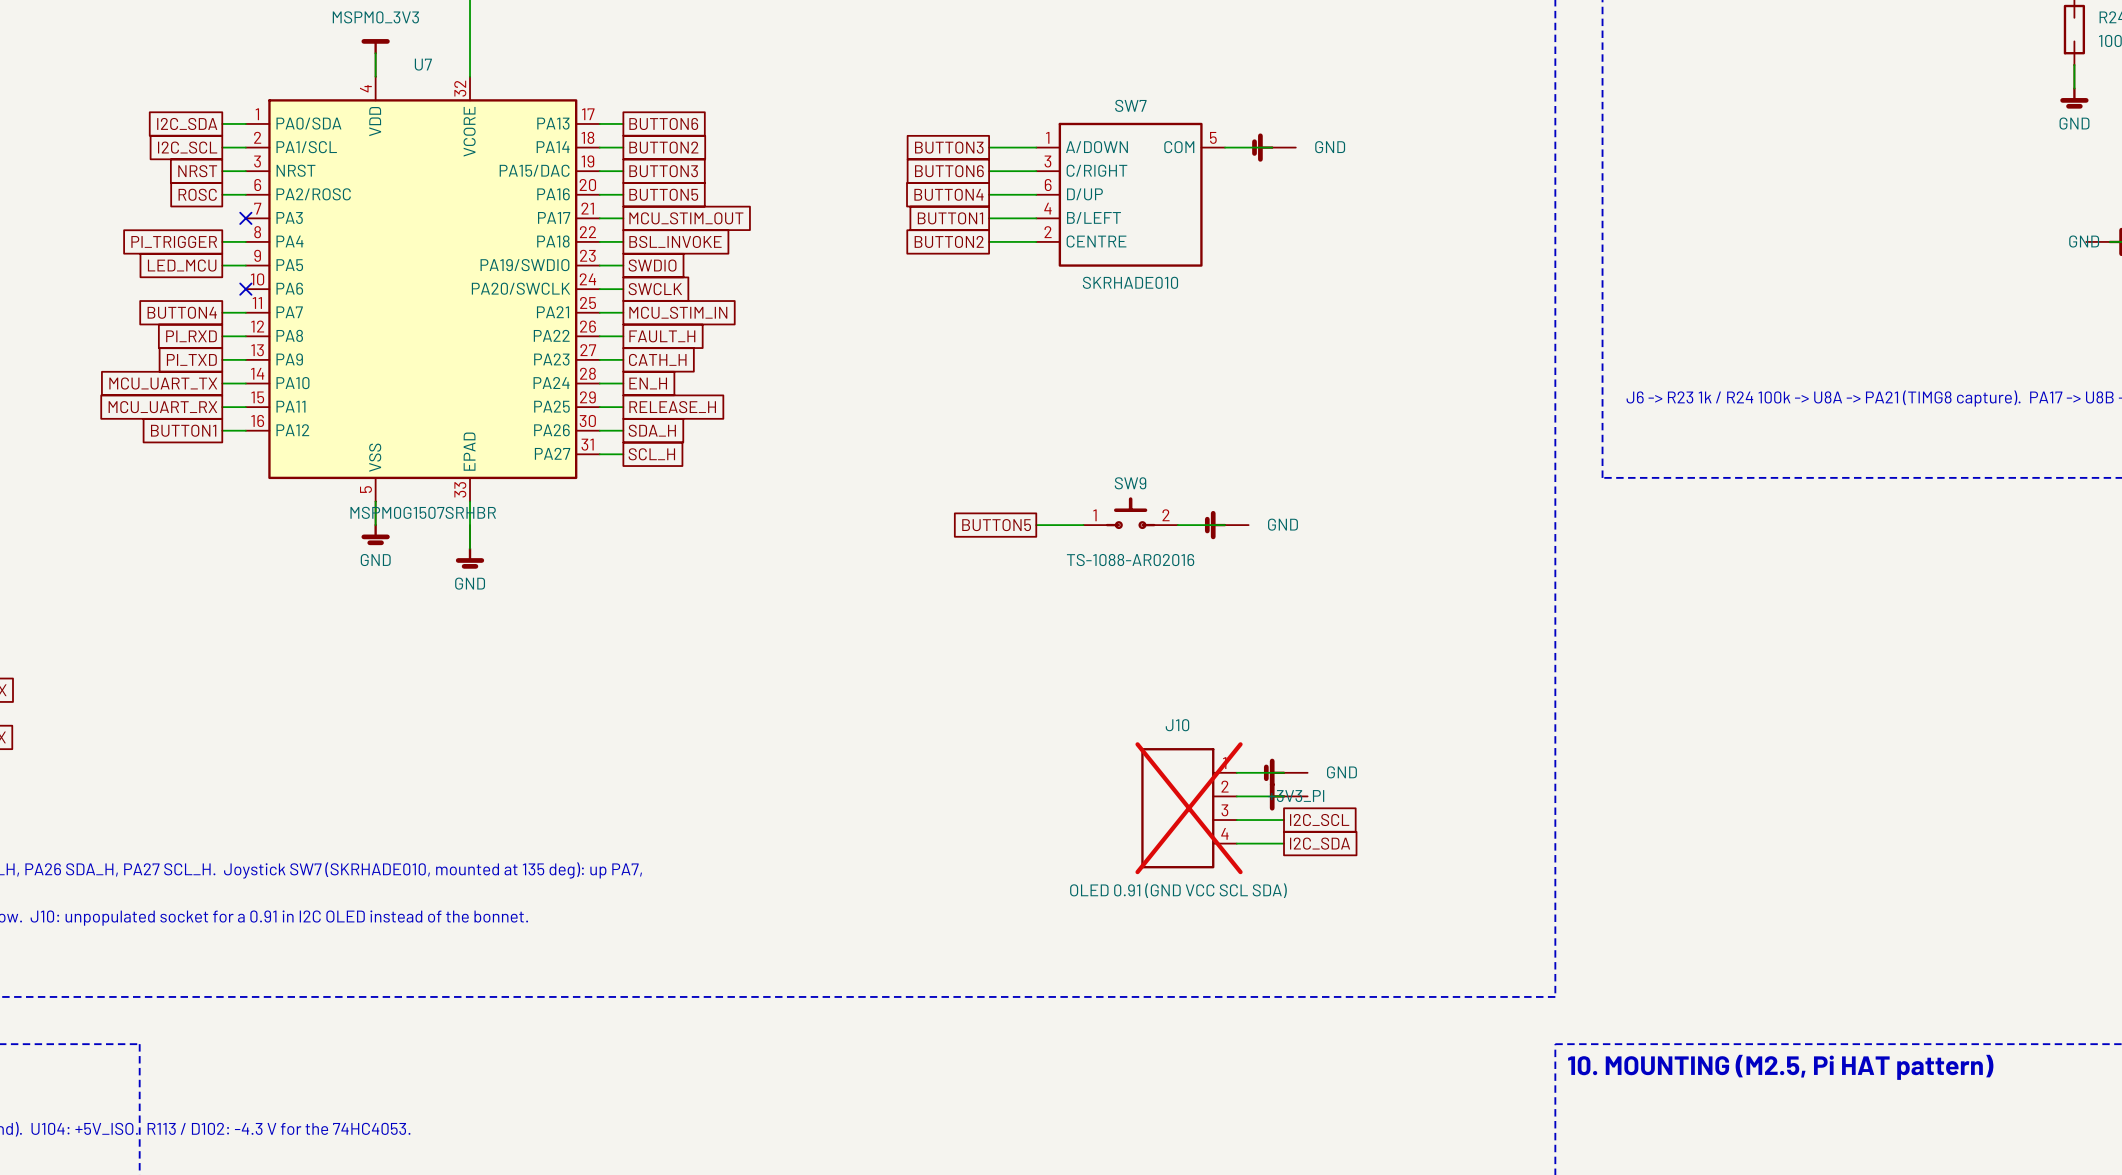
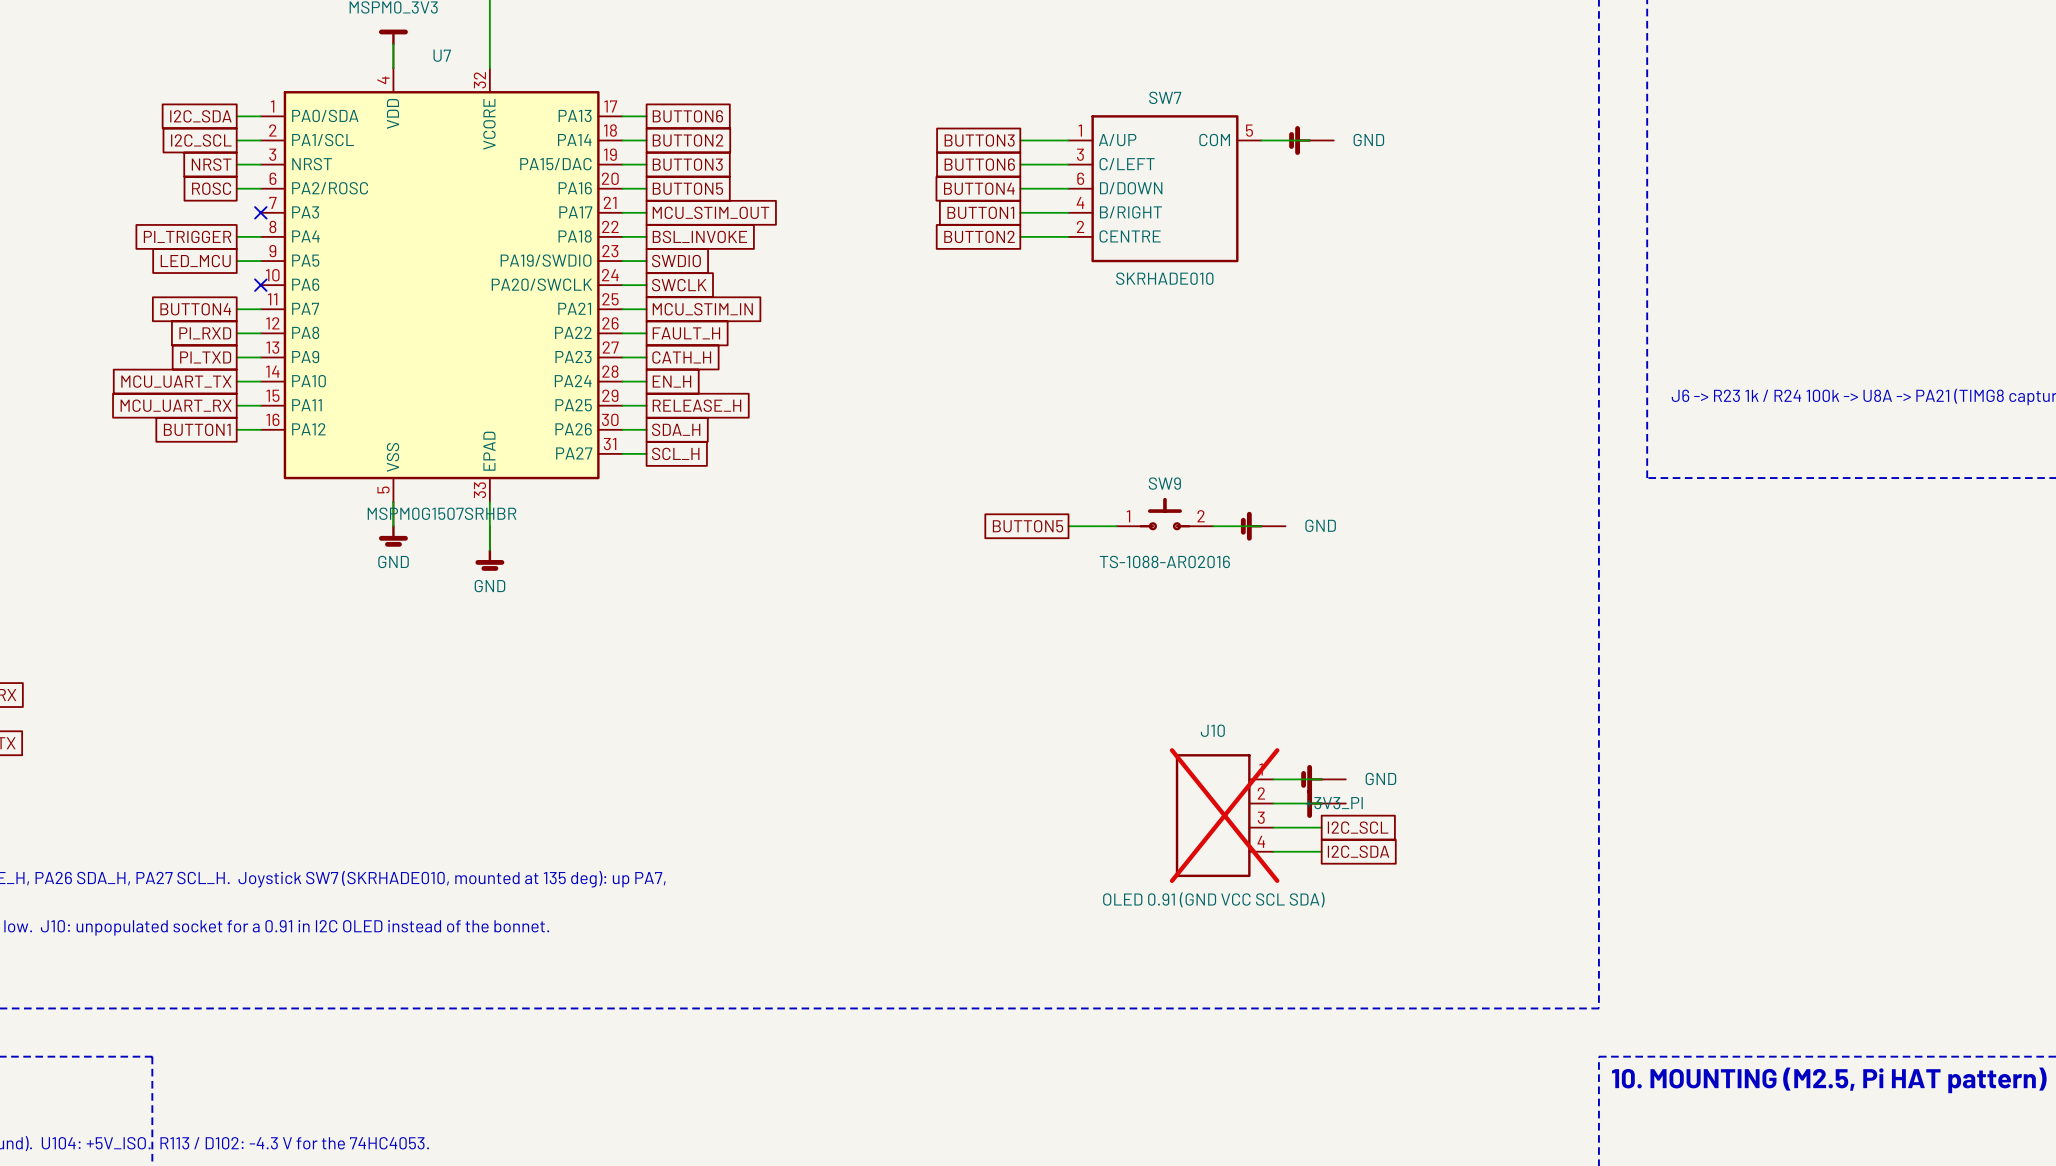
SW7 pin name: A/DOWN (1096, 147) -> A/UP (1117, 140)
SW7 pin name: C/RIGHT (1096, 170) -> C/LEFT (1127, 164)
SW7 pin name: D/UP (1084, 194) -> D/DOWN (1131, 188)
SW7 pin name: B/LEFT (1093, 217) -> B/RIGHT (1130, 212)

